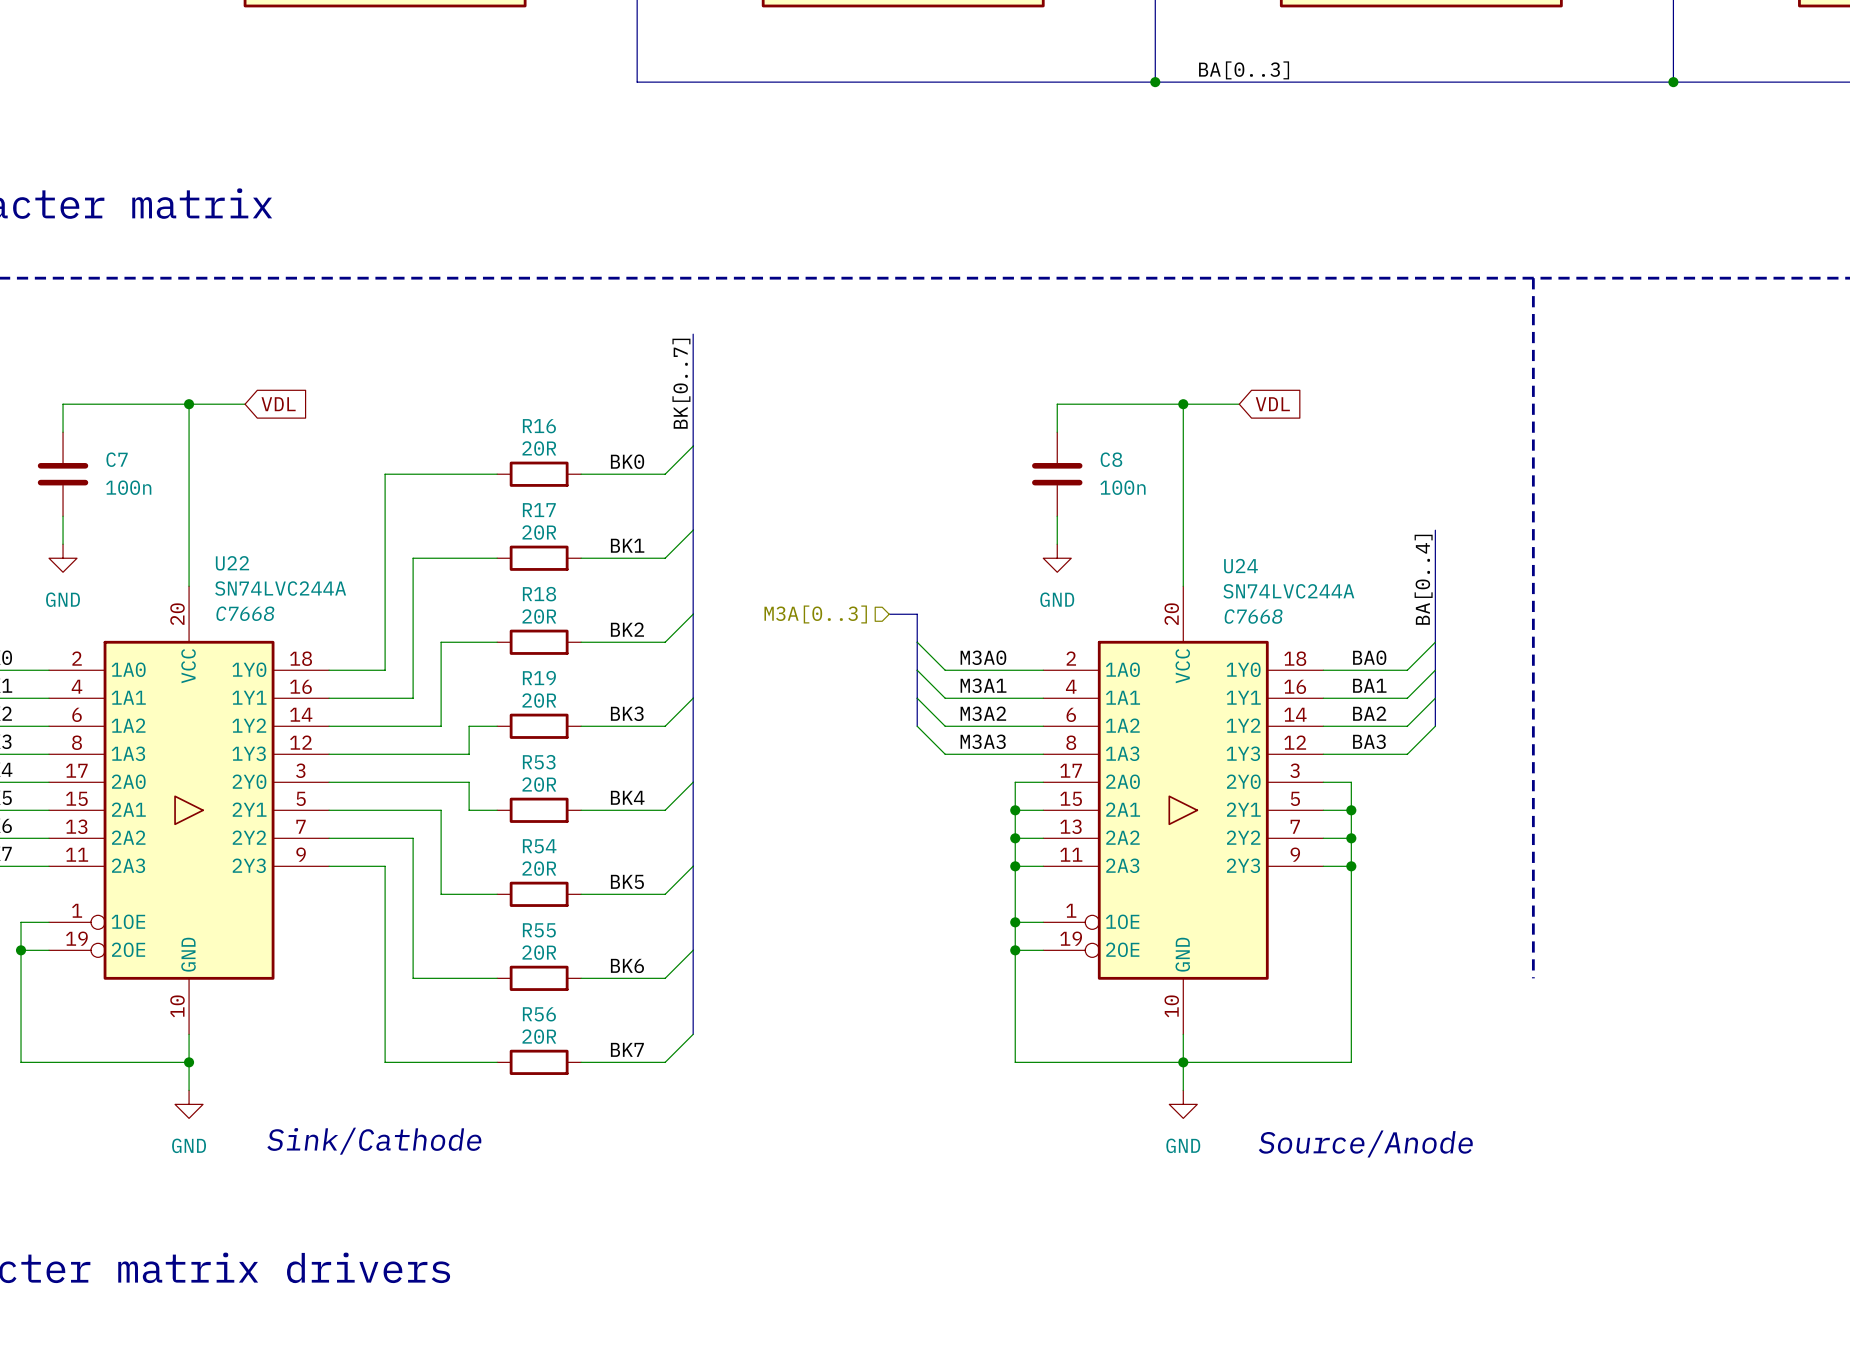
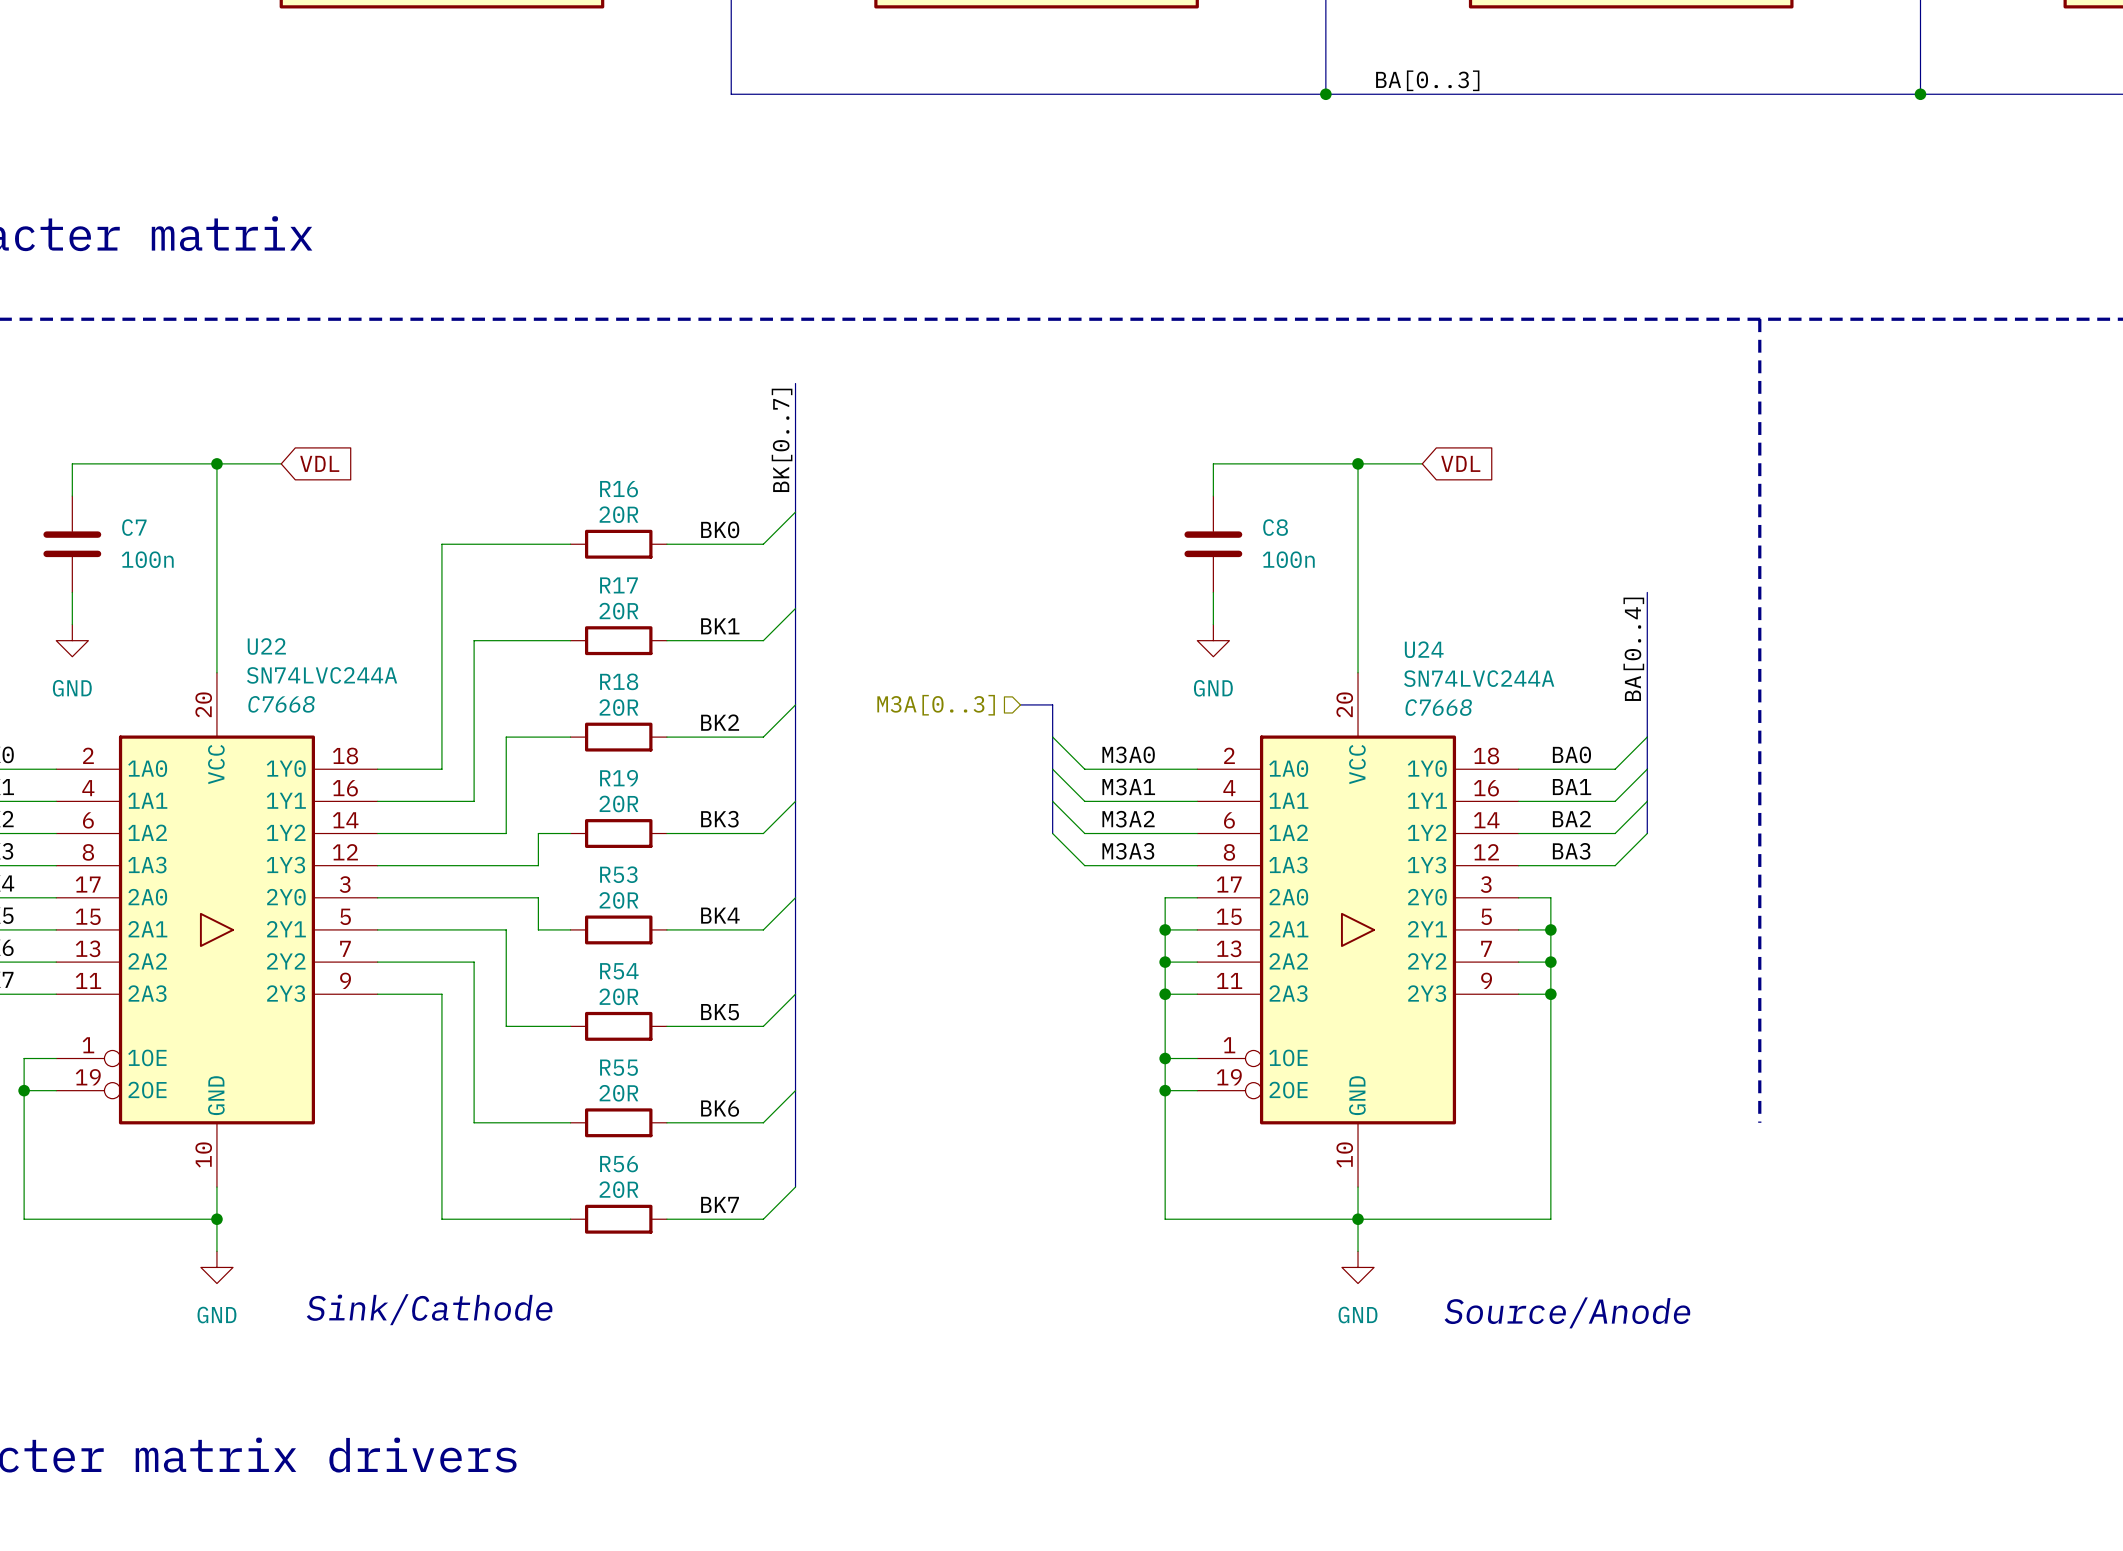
bus: none -> (1647, 592) (1647, 608)
label position: BA[0..4] (1423, 579) -> BA[0..4] (1633, 649)

